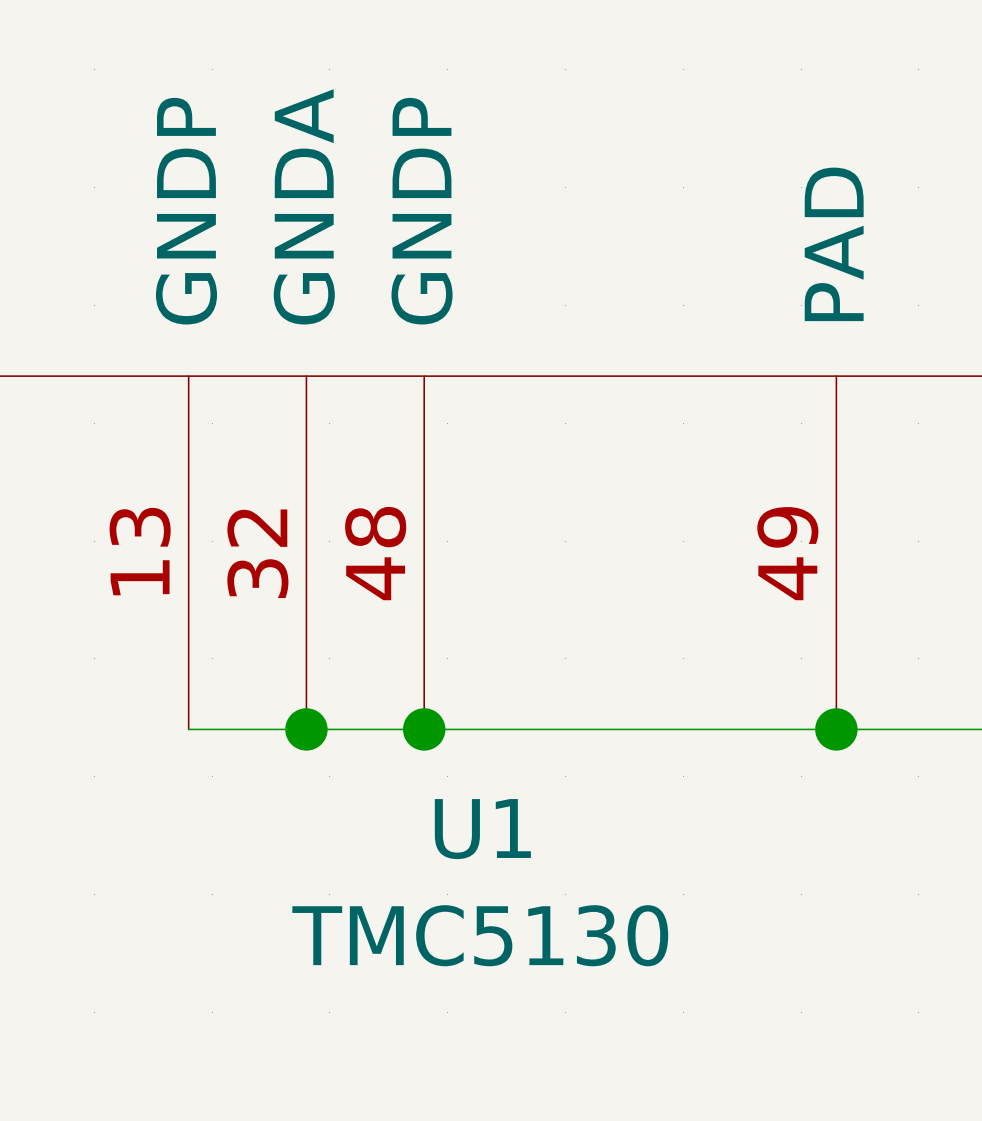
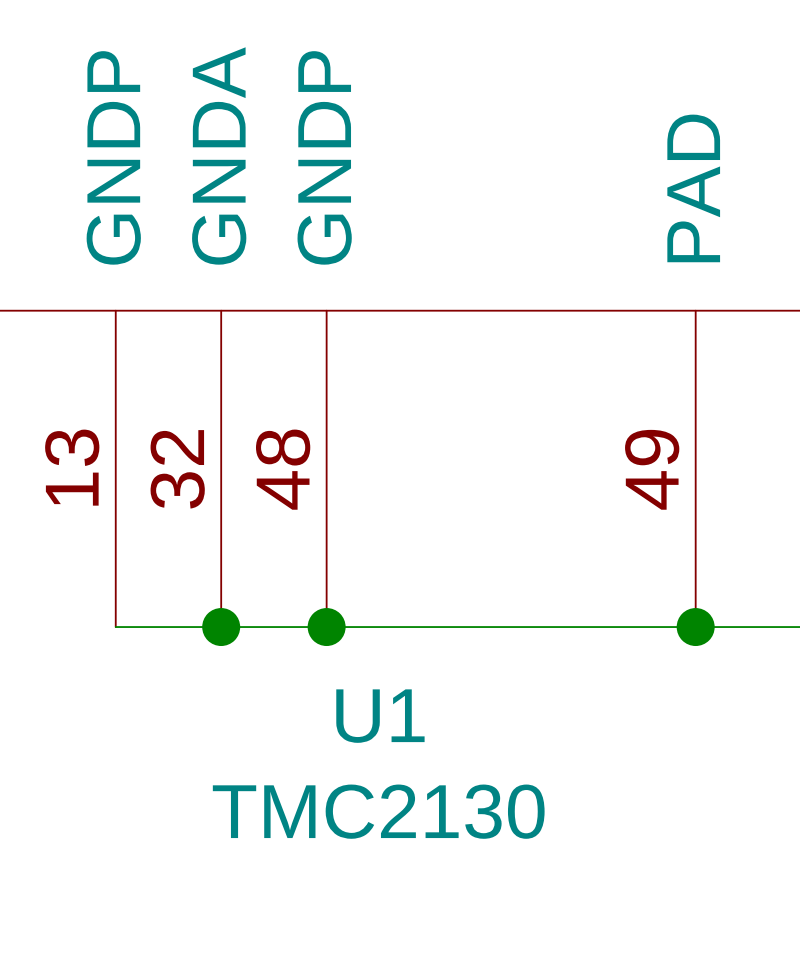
U1 value: TMC5130 (480, 935) -> TMC2130 (378, 811)

